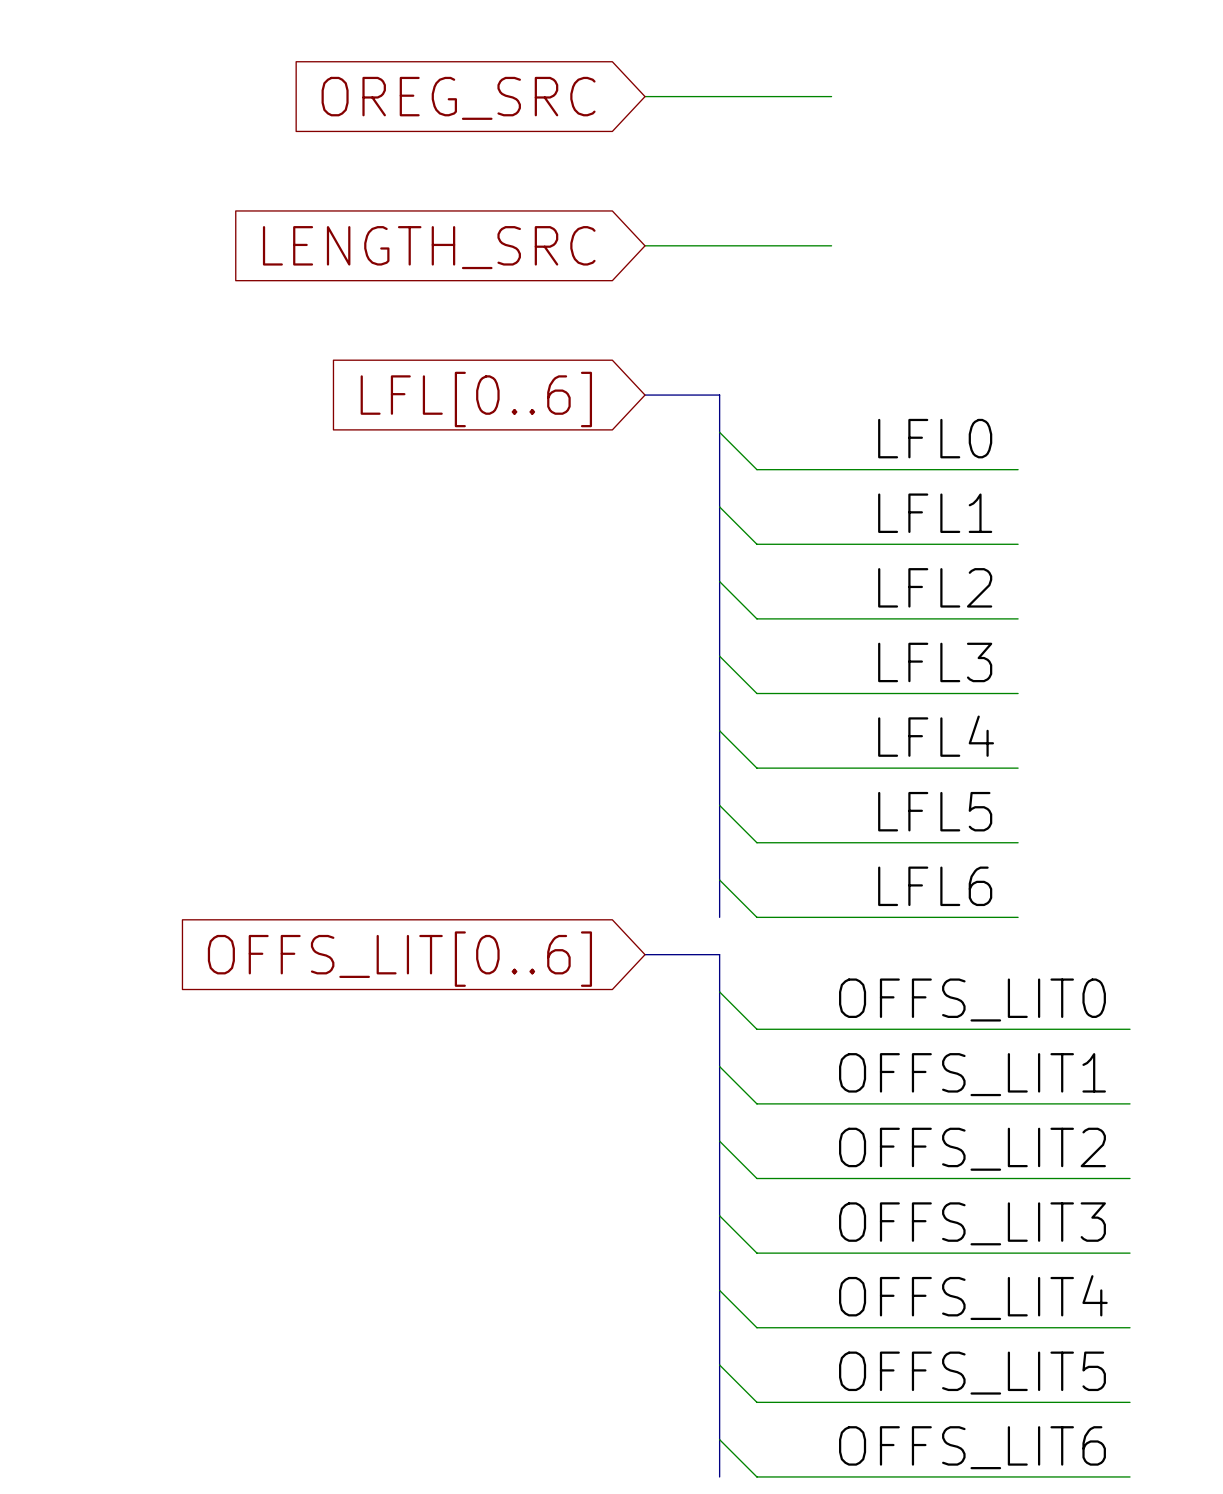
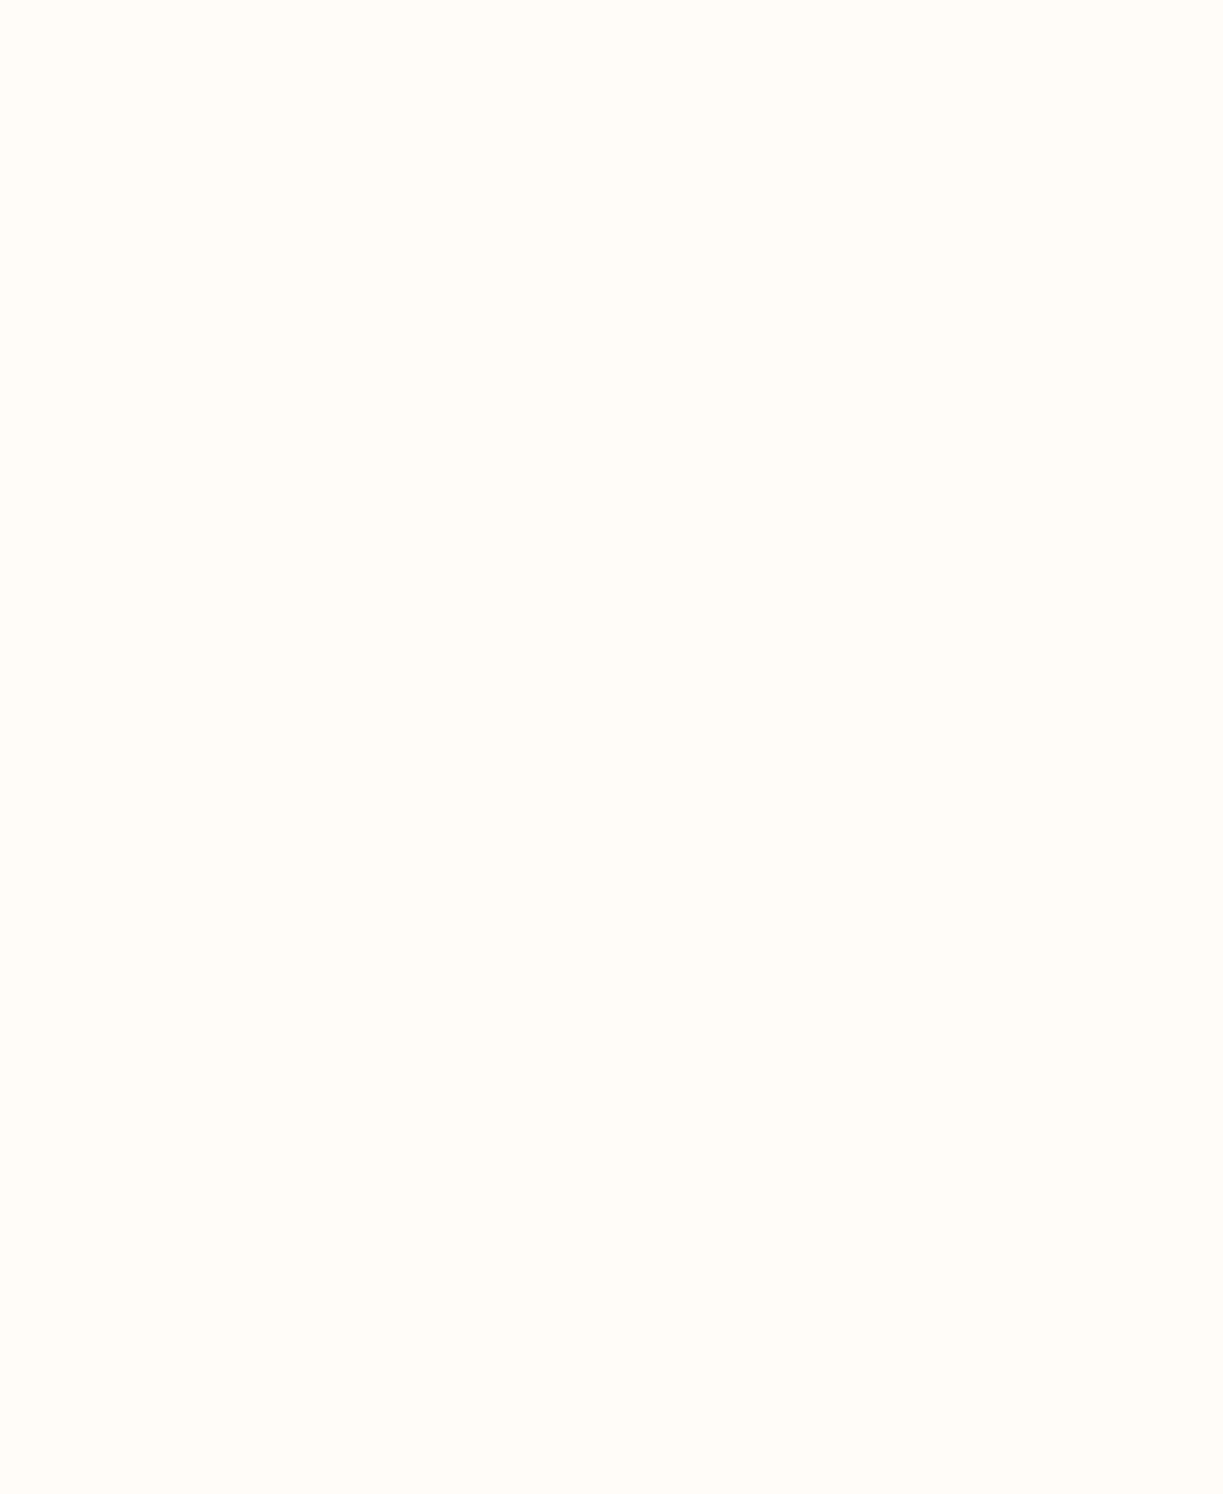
wire: (645, 96) (831, 96) -> none
global label: OREG_SRC (458, 98) -> none
wire: (645, 245) (831, 245) -> none
global label: LENGTH_SRC (429, 247) -> none
bus: (645, 395) (719, 395) (719, 917) -> none
global label: LFL[0..6] (476, 399) -> none
wire: (719, 432) (756, 469) (1018, 469) -> none
label: LFL0 (935, 438) -> none
wire: (719, 506) (756, 544) (1018, 544) -> none
label: LFL1 (935, 513) -> none
wire: (719, 581) (756, 618) (1018, 618) -> none
label: LFL2 (935, 587) -> none
wire: (719, 656) (756, 693) (1018, 693) -> none
label: LFL3 (935, 662) -> none
wire: (719, 730) (756, 768) (1018, 768) -> none
label: LFL4 (936, 736) -> none
wire: (719, 805) (756, 842) (1018, 842) -> none
label: LFL5 (935, 811) -> none
wire: (719, 880) (756, 917) (1018, 917) -> none
label: LFL6 (935, 886) -> none
bus: (645, 954) (719, 954) (719, 1476) -> none
global label: OFFS_LIT[0..6] (399, 959) -> none
wire: (719, 991) (756, 1029) (1130, 1029) -> none
label: OFFS_LIT0 (972, 1000) -> none
wire: (719, 1066) (756, 1103) (1130, 1103) -> none
label: OFFS_LIT1 (972, 1074) -> none
wire: (719, 1141) (756, 1178) (1130, 1178) -> none
label: OFFS_LIT2 (972, 1149) -> none
wire: (719, 1215) (756, 1253) (1130, 1253) -> none
label: OFFS_LIT3 (972, 1223) -> none
wire: (719, 1290) (756, 1327) (1130, 1327) -> none
label: OFFS_LIT4 (973, 1297) -> none
wire: (719, 1365) (756, 1402) (1130, 1402) -> none
label: OFFS_LIT5 (972, 1373) -> none
wire: (719, 1439) (756, 1476) (1130, 1476) -> none
label: OFFS_LIT6 (972, 1447) -> none

